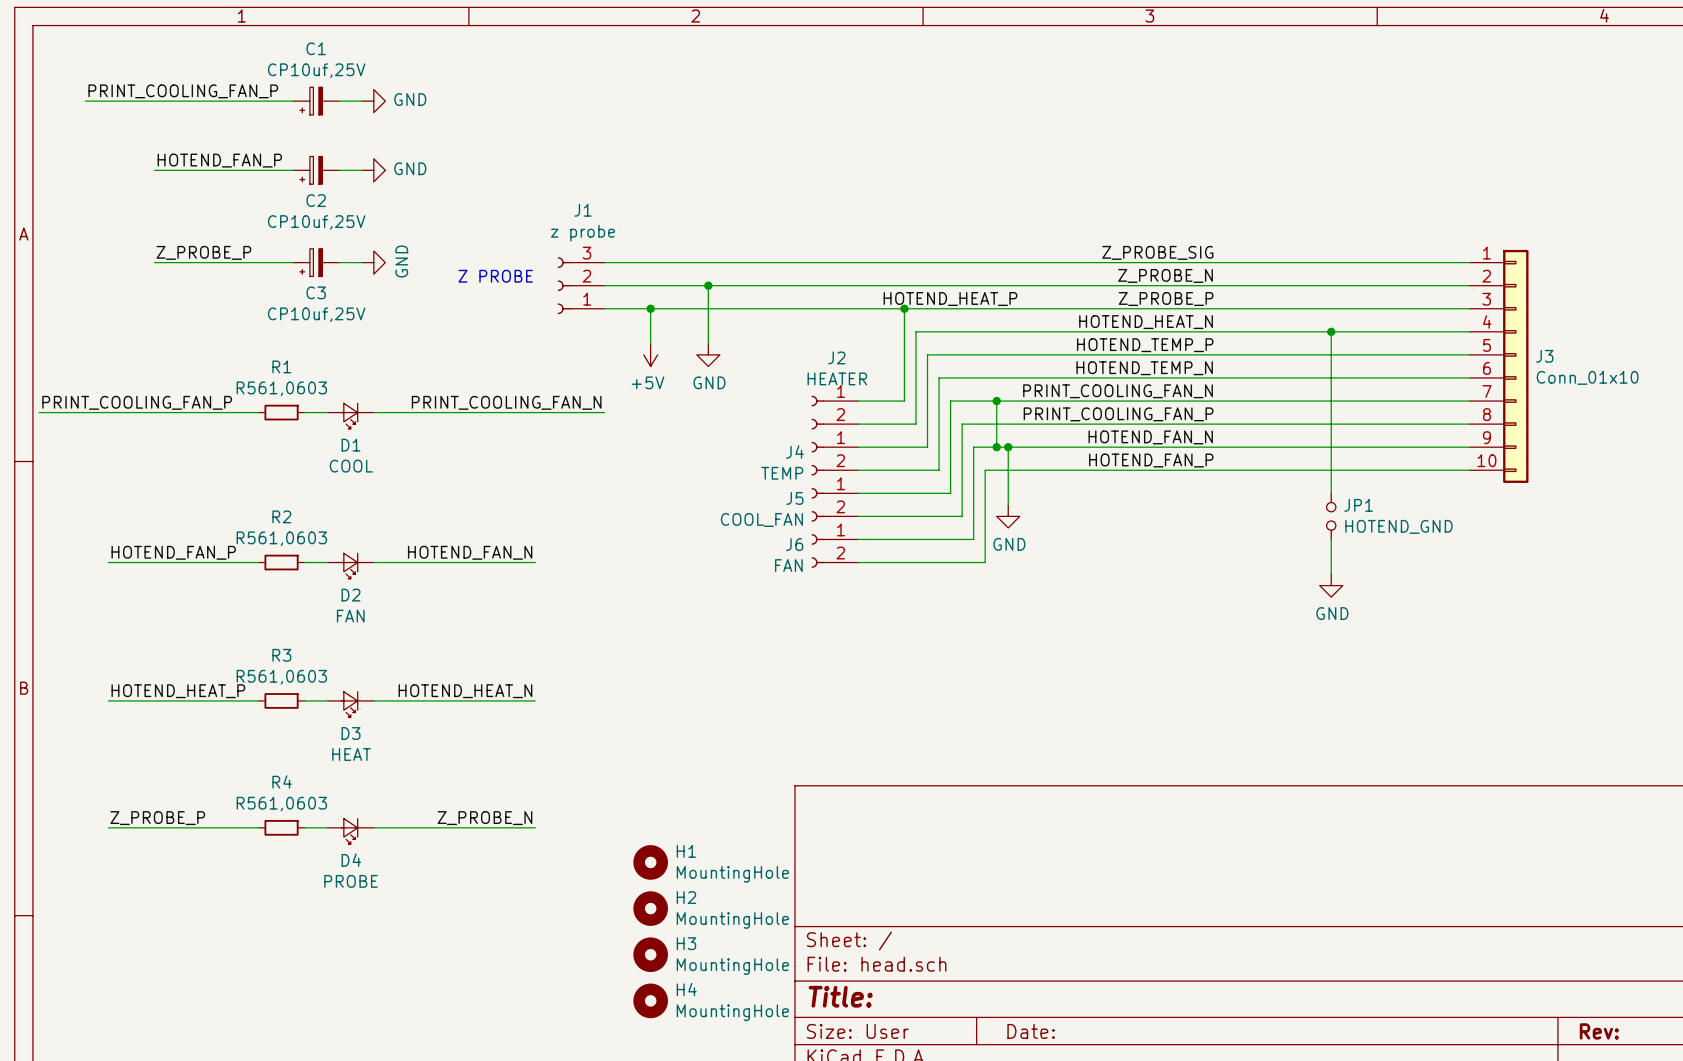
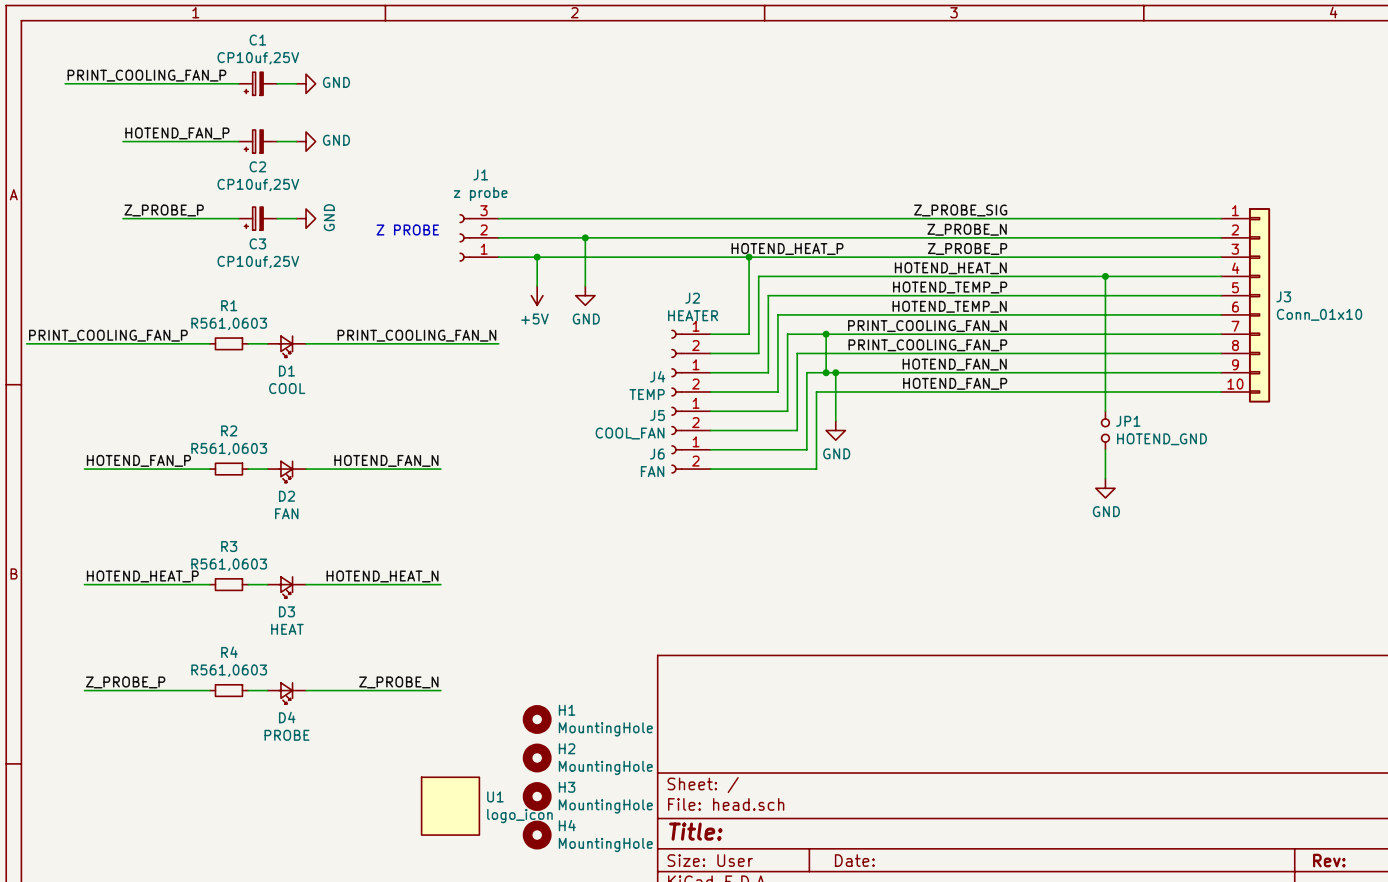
U1: none -> logo_icon (450, 806)

